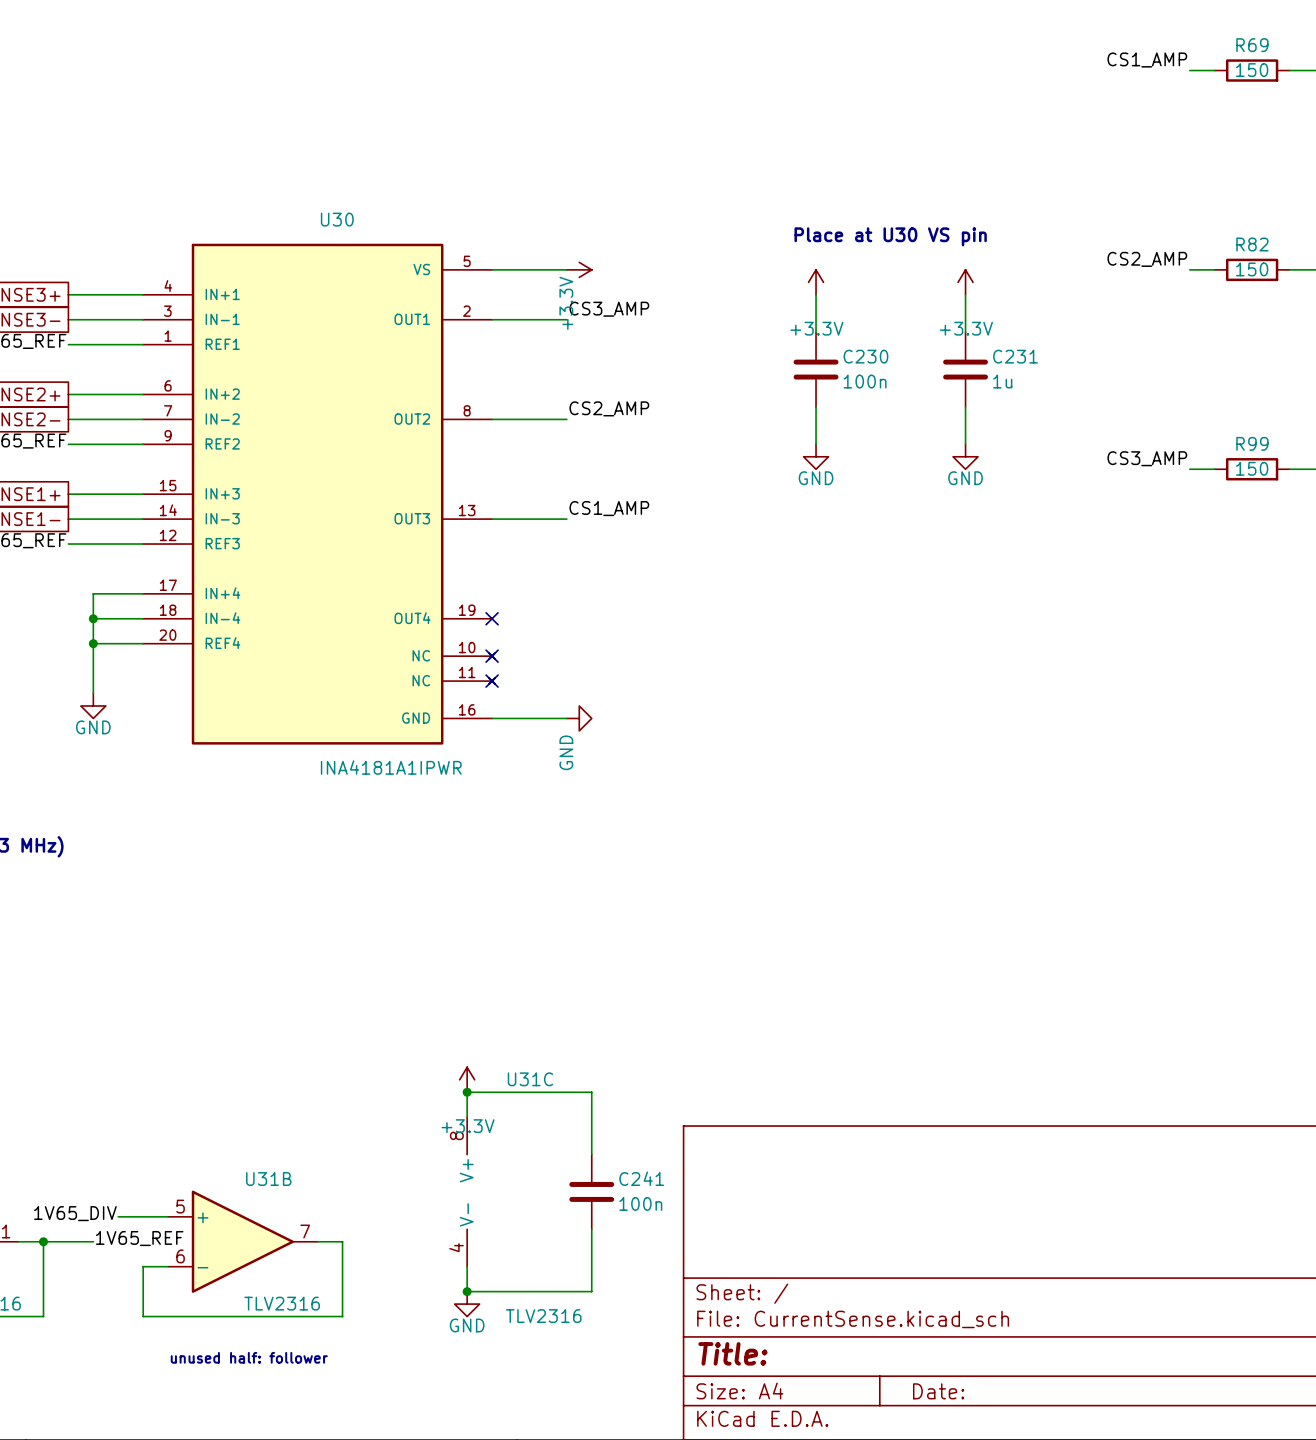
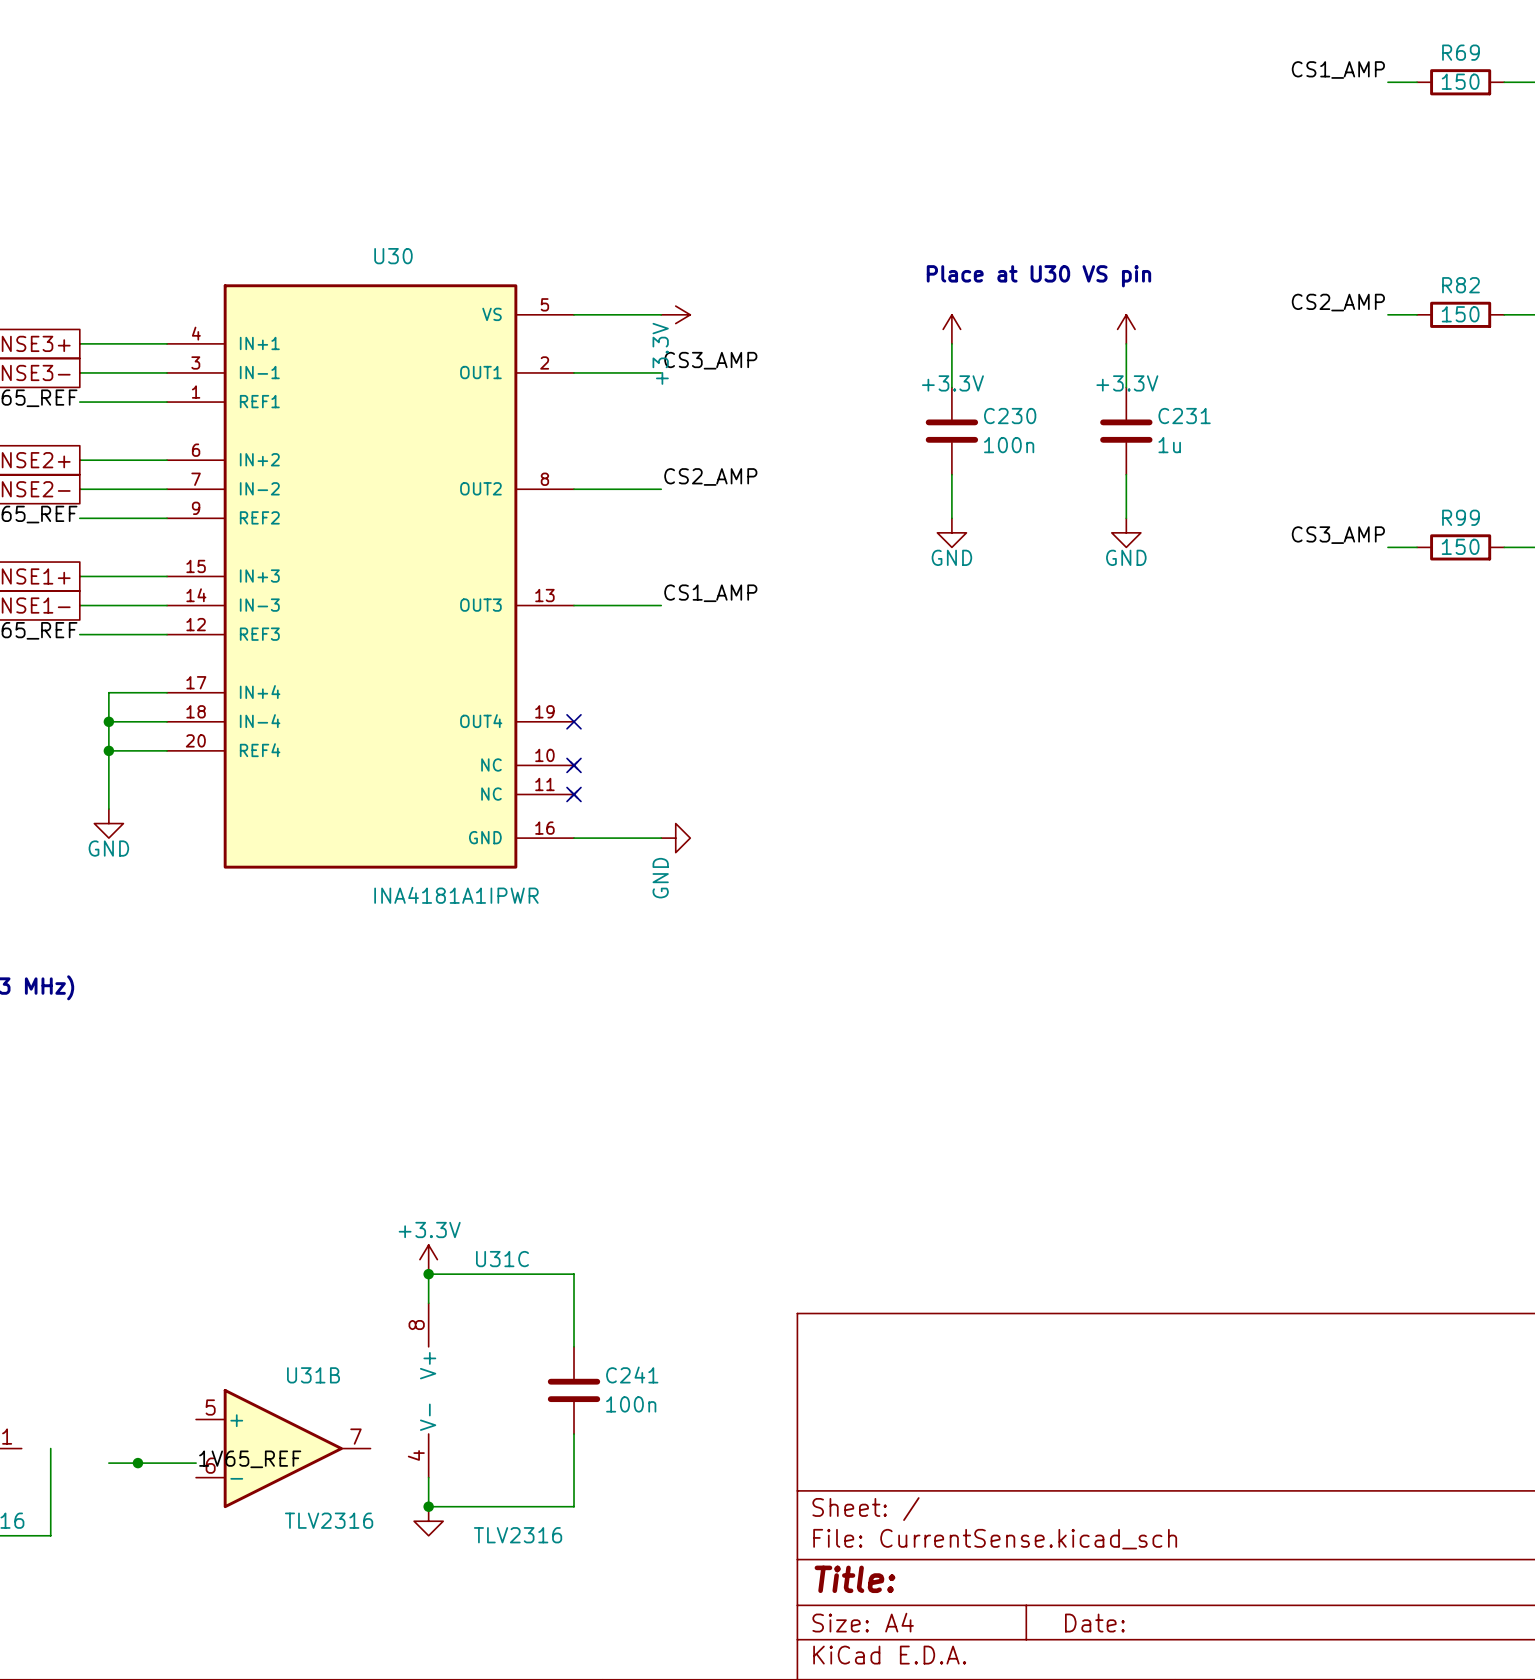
power symbol position: +3.3V (467, 1079) -> +3.3V (428, 1259)
junction: none -> (428, 1274)
wire: (467, 1092) (467, 1117) -> (544, 1274) (428, 1274) (428, 1303)
junction: (467, 1092) -> none
wire: (492, 1092) (591, 1092) (591, 1154) -> (574, 1274) (574, 1346)
power symbol text position: +3.3V (468, 1126) -> +3.3V (429, 1229)
U31C position: (467, 1191) -> (428, 1390)
C241 position: (591, 1191) -> (574, 1390)
label: 1V65_DIV (75, 1213) -> none
wire: (118, 1216) (168, 1216) -> none
wire: (591, 1229) (591, 1291) (492, 1291) -> (574, 1434) (574, 1506)
label position: 1V65_REF (139, 1238) -> 1V65_REF (250, 1459)
wire: (18, 1241) (93, 1241) -> (108, 1463) (196, 1463)
junction: (43, 1241) -> none
wire: (317, 1241) (342, 1241) (342, 1316) (143, 1316) (143, 1266) (168, 1266) -> none
junction: none -> (137, 1463)
wire: (467, 1266) (467, 1291) -> (428, 1477) (428, 1506) (544, 1506)
junction: none -> (428, 1506)
junction: (467, 1291) -> none
power symbol: none -> (428, 1521)
power symbol: GND (467, 1304) -> none
text: unused half: follower (249, 1357) -> none

